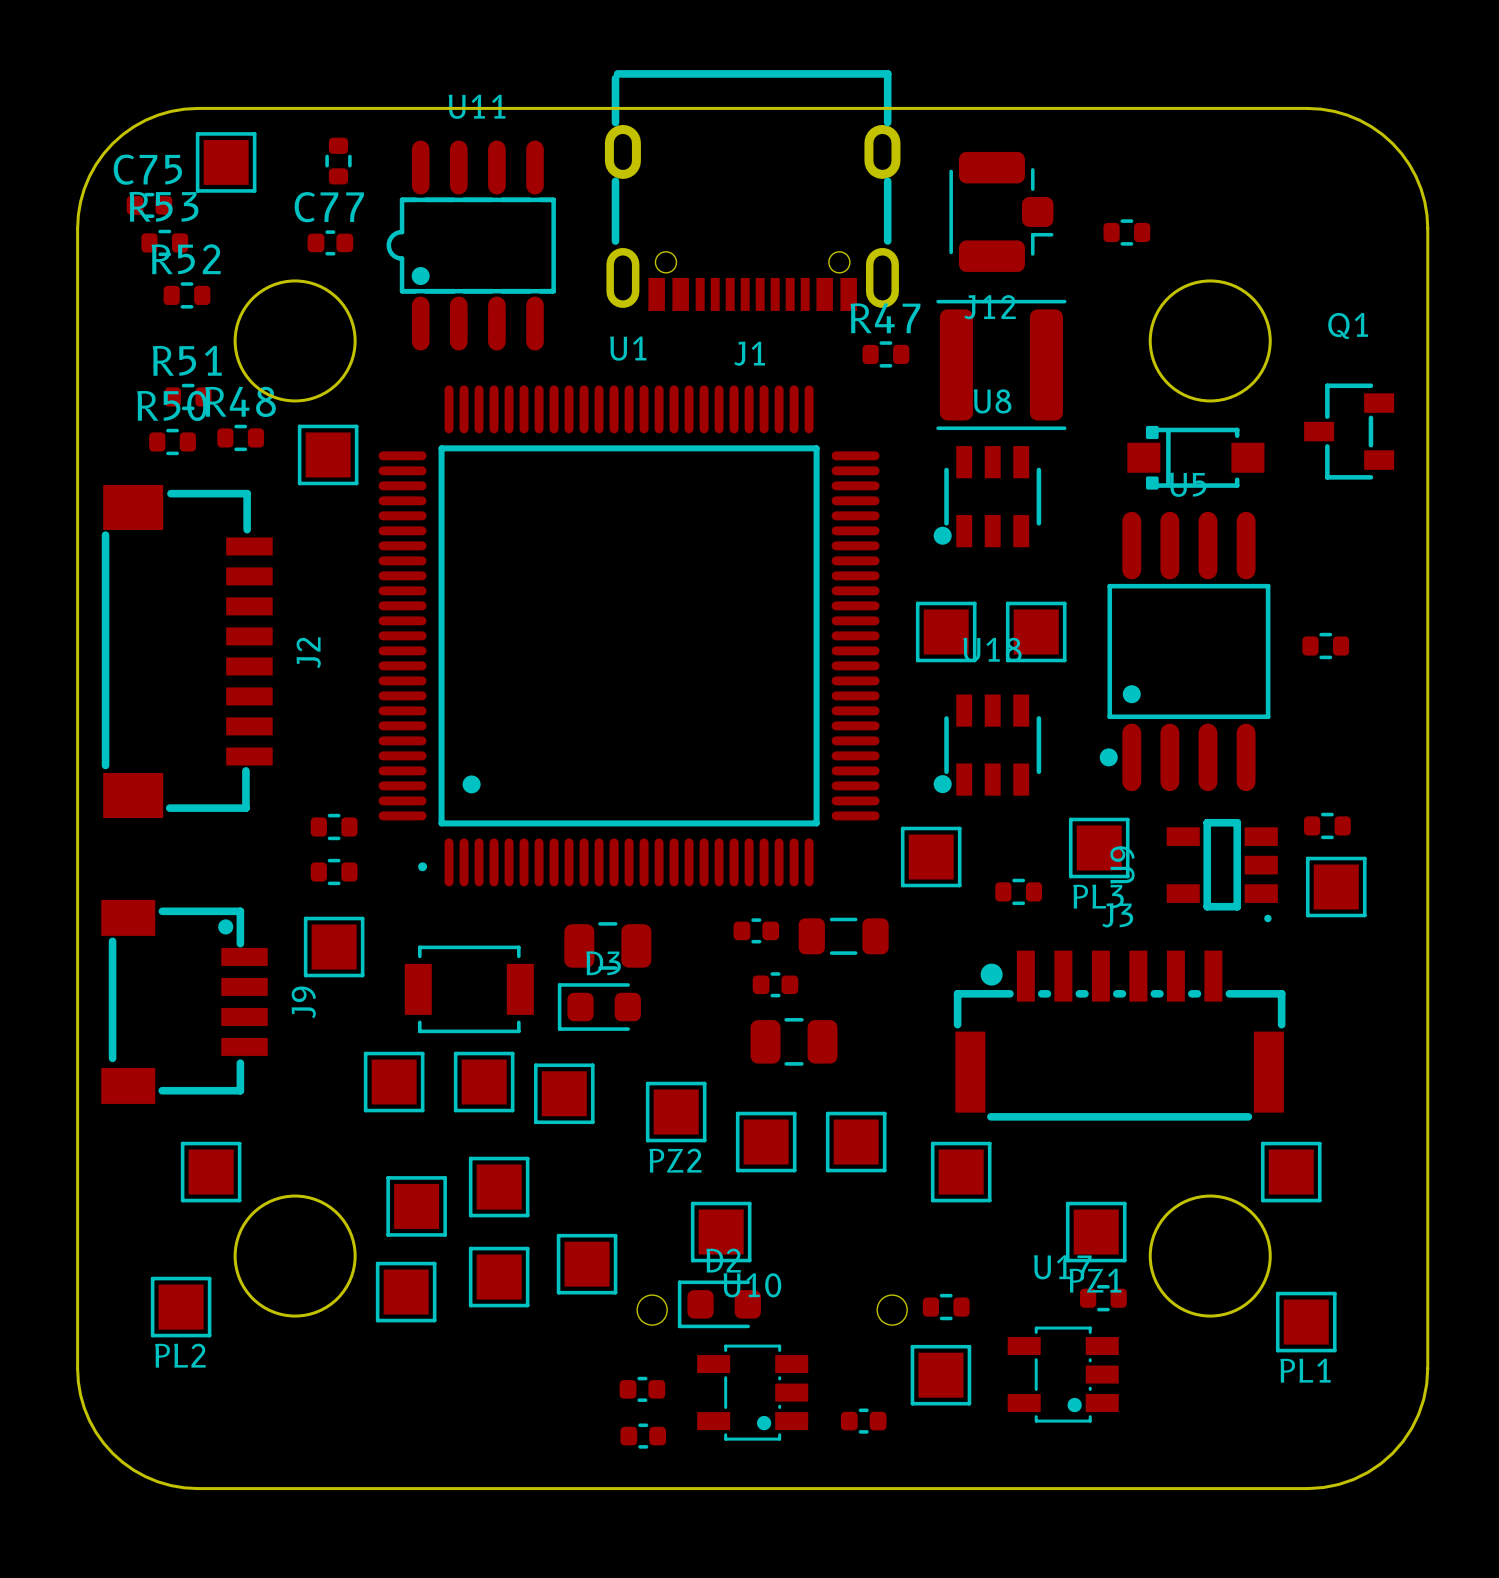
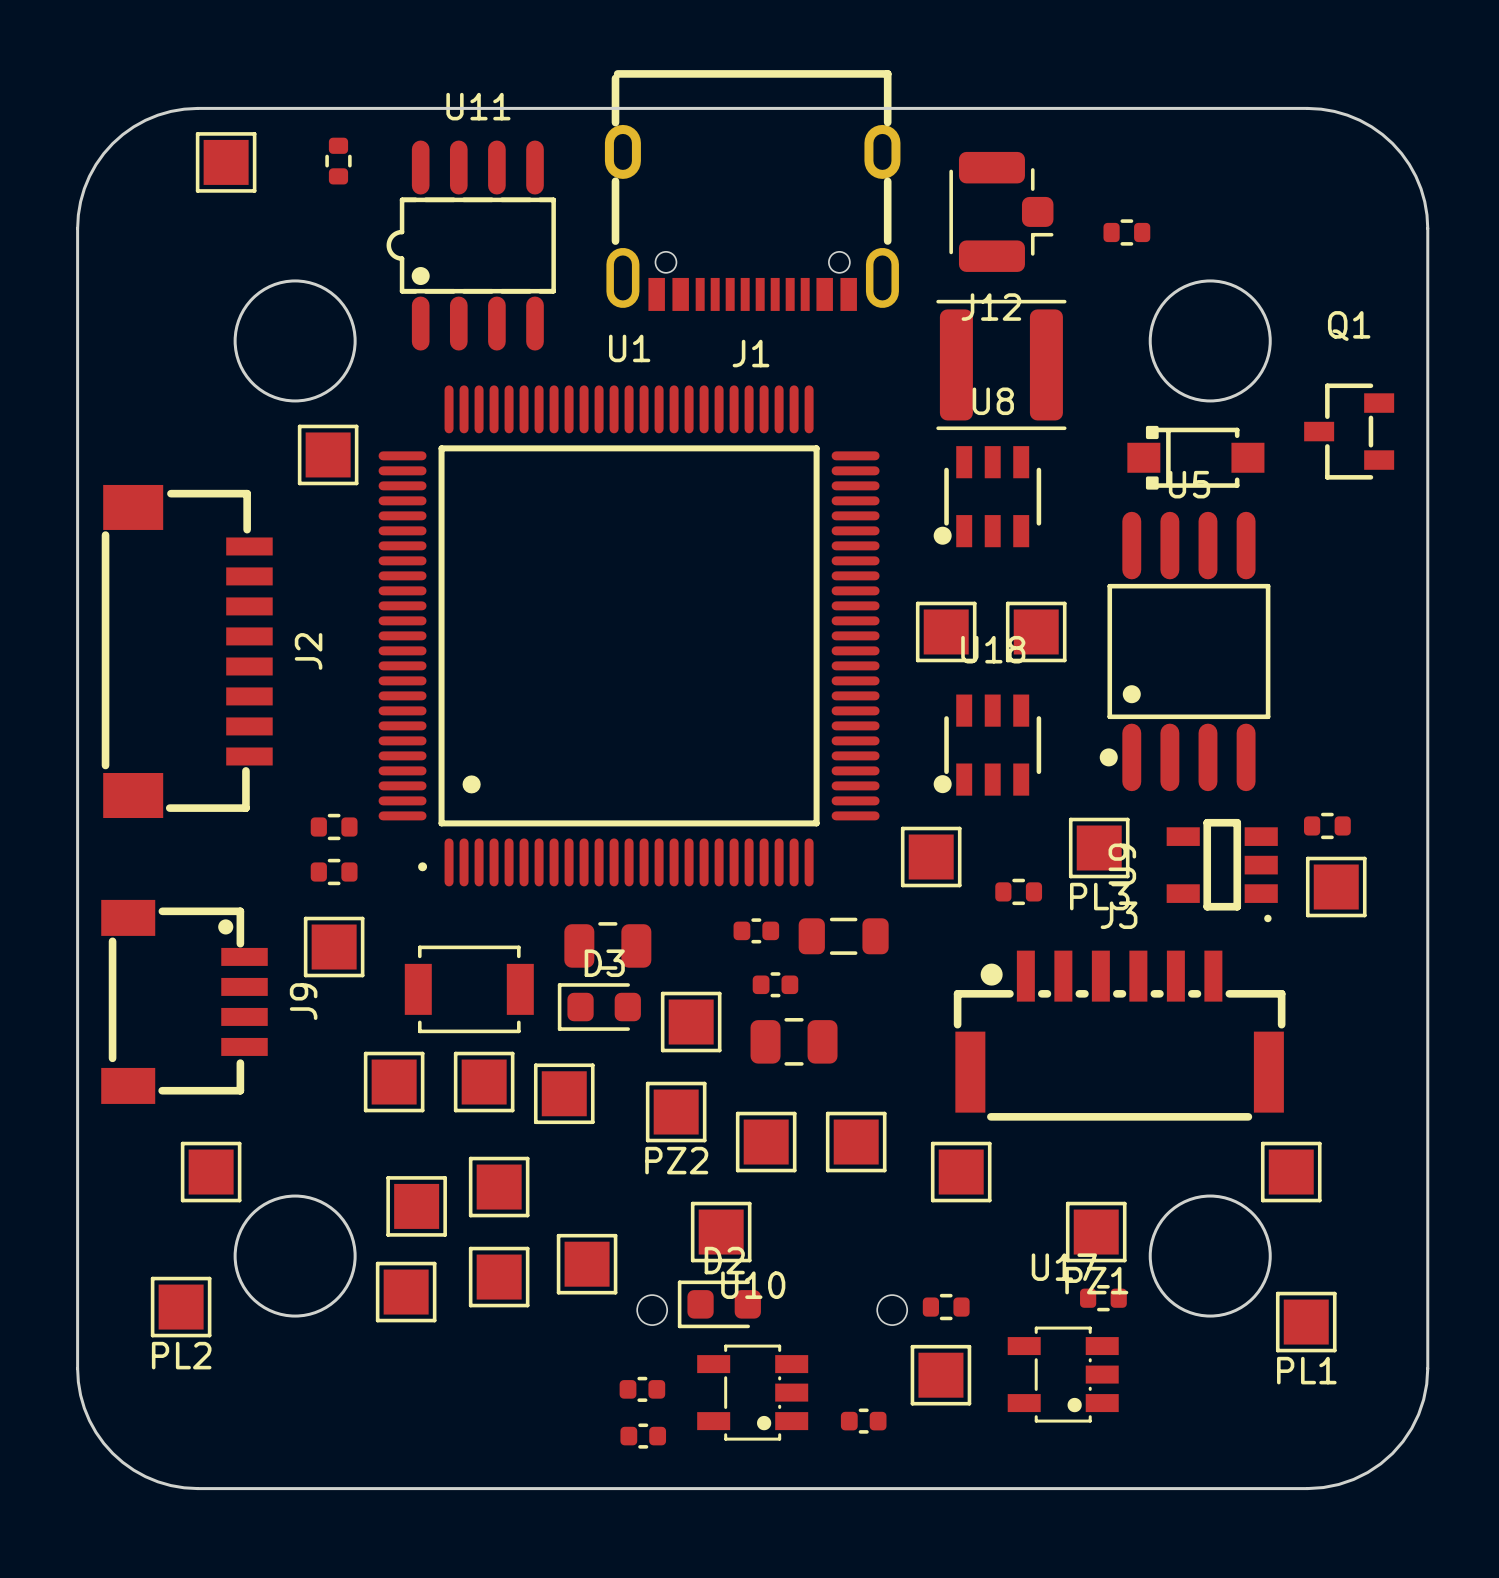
C75: (149, 205) -> none
R53: (164, 242) -> none
C77: (330, 242) -> none
R52: (186, 295) -> none
R47: (885, 354) -> none
R51: (188, 396) -> none
R48: (240, 437) -> none
R50: (172, 441) -> none
part: (1325, 646) -> none
part: none -> (691, 1022)

